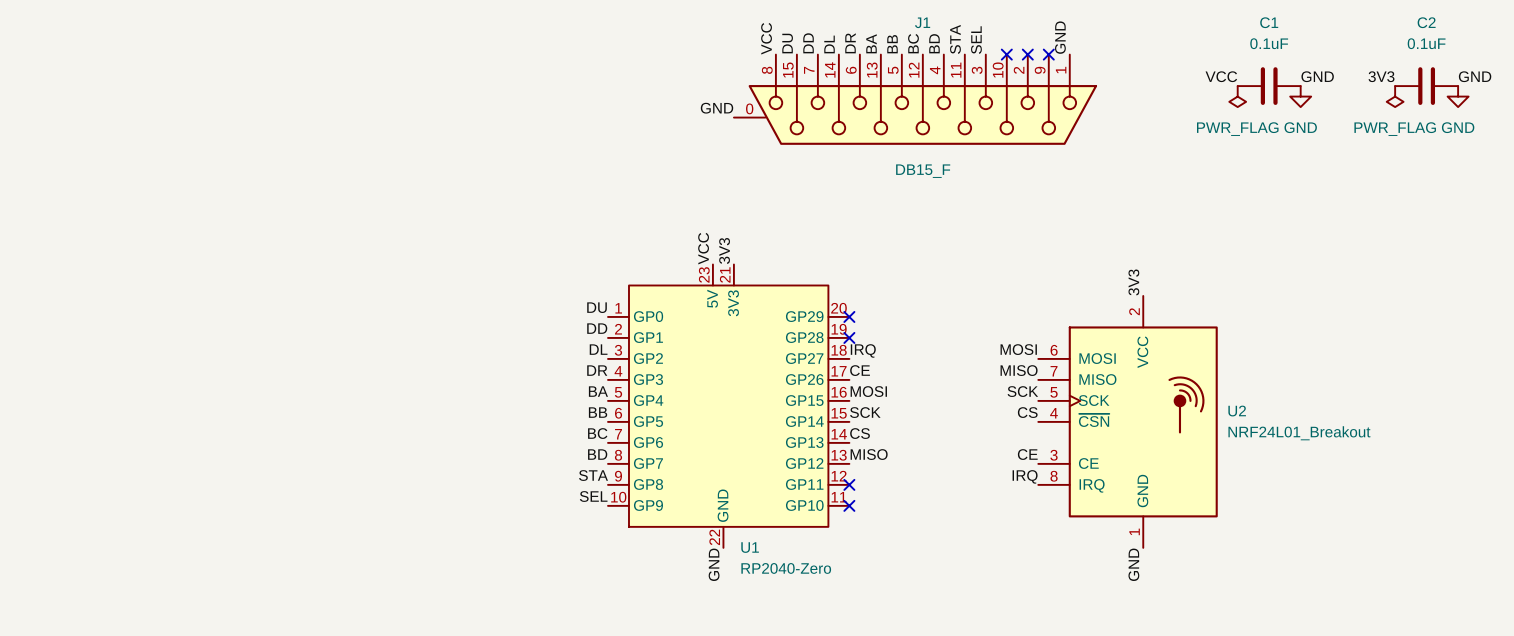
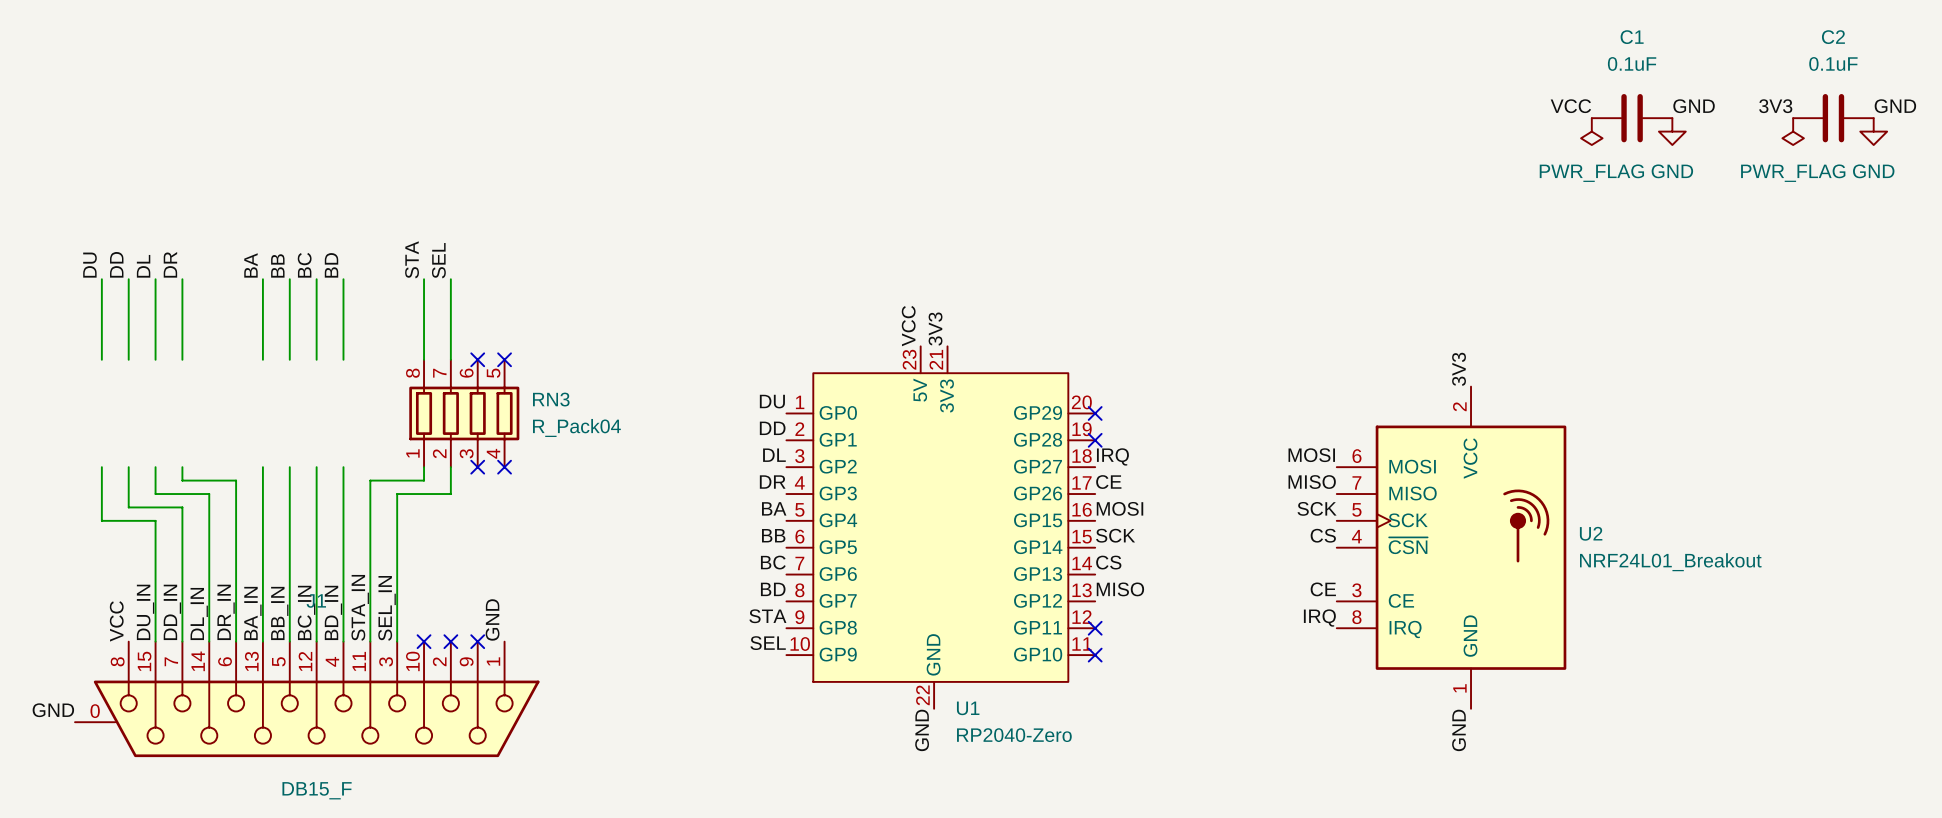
label: GND (1060, 37) -> none
label: VCC (766, 38) -> none
label: STA (955, 39) -> none
label: SEL (976, 40) -> none
label: DU (787, 43) -> none
label: DD (808, 43) -> none
label: DR (850, 43) -> none
label: BA (871, 43) -> none
label: BC (913, 43) -> none
label: BD (934, 43) -> none
label: DL (829, 44) -> none
label: BB (892, 44) -> none
no-connect mark: (1006, 54) -> none
no-connect mark: (1027, 54) -> none
no-connect mark: (1048, 54) -> none
J1 position: (915, 99) -> (307, 699)
label: GND (717, 108) -> none
label: none -> STA (412, 259)
label: none -> SEL (438, 260)
label: none -> DU (89, 265)
label: none -> DD (116, 264)
label: none -> DR (170, 264)
label: none -> DL (143, 266)
label: none -> BA (250, 265)
label: none -> BB (277, 265)
label: none -> BC (304, 265)
label: none -> BD (331, 265)
wire: none -> (101, 279) (101, 359)
wire: none -> (128, 279) (128, 359)
wire: none -> (155, 279) (155, 359)
wire: none -> (182, 279) (182, 359)
wire: none -> (262, 279) (262, 359)
wire: none -> (289, 279) (289, 359)
wire: none -> (316, 279) (316, 359)
wire: none -> (343, 279) (343, 359)
wire: none -> (424, 279) (424, 359)
wire: none -> (450, 279) (450, 359)
no-connect mark: none -> (477, 359)
no-connect mark: none -> (504, 359)
RN3: none -> R_Pack04 (464, 413)
wire: none -> (101, 467) (101, 520) (155, 520) (155, 641)
wire: none -> (128, 467) (128, 507) (182, 507) (182, 641)
wire: none -> (155, 467) (155, 494) (209, 494) (209, 641)
wire: none -> (182, 467) (182, 480) (236, 480) (236, 641)
wire: none -> (262, 467) (262, 641)
wire: none -> (289, 467) (289, 641)
wire: none -> (316, 467) (316, 641)
wire: none -> (343, 467) (343, 641)
wire: none -> (424, 467) (424, 480) (370, 480) (370, 641)
wire: none -> (450, 467) (450, 494) (397, 494) (397, 641)
no-connect mark: none -> (477, 467)
no-connect mark: none -> (504, 467)
label: none -> STA_IN (360, 607)
label: none -> SEL_IN (387, 608)
label: none -> DU_IN (145, 612)
label: none -> DD_IN (172, 612)
label: none -> DR_IN (226, 612)
label: none -> BC_IN (306, 612)
label: none -> BD_IN (333, 612)
label: none -> DL_IN (199, 614)
label: none -> BA_IN (252, 613)
label: none -> BB_IN (279, 613)
label: none -> GND (492, 619)
label: none -> VCC (116, 621)
no-connect mark: none -> (424, 641)
no-connect mark: none -> (450, 641)
no-connect mark: none -> (477, 641)
label: none -> GND (53, 710)

